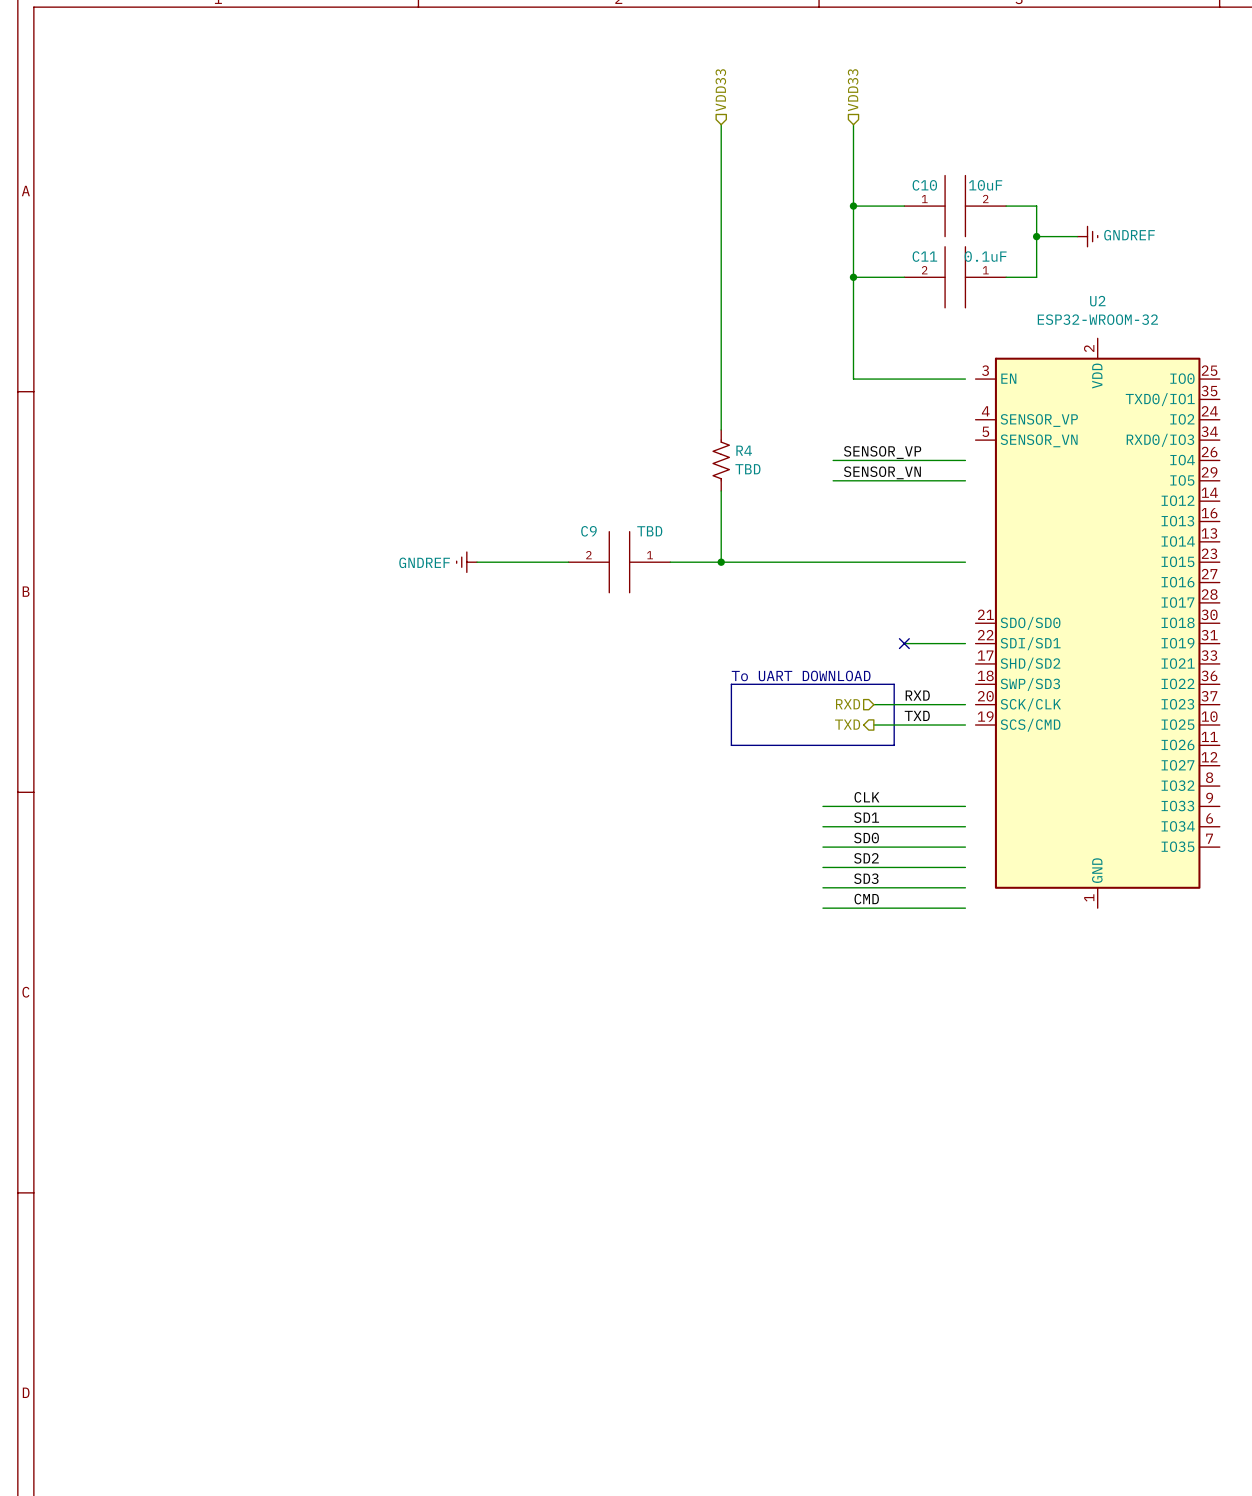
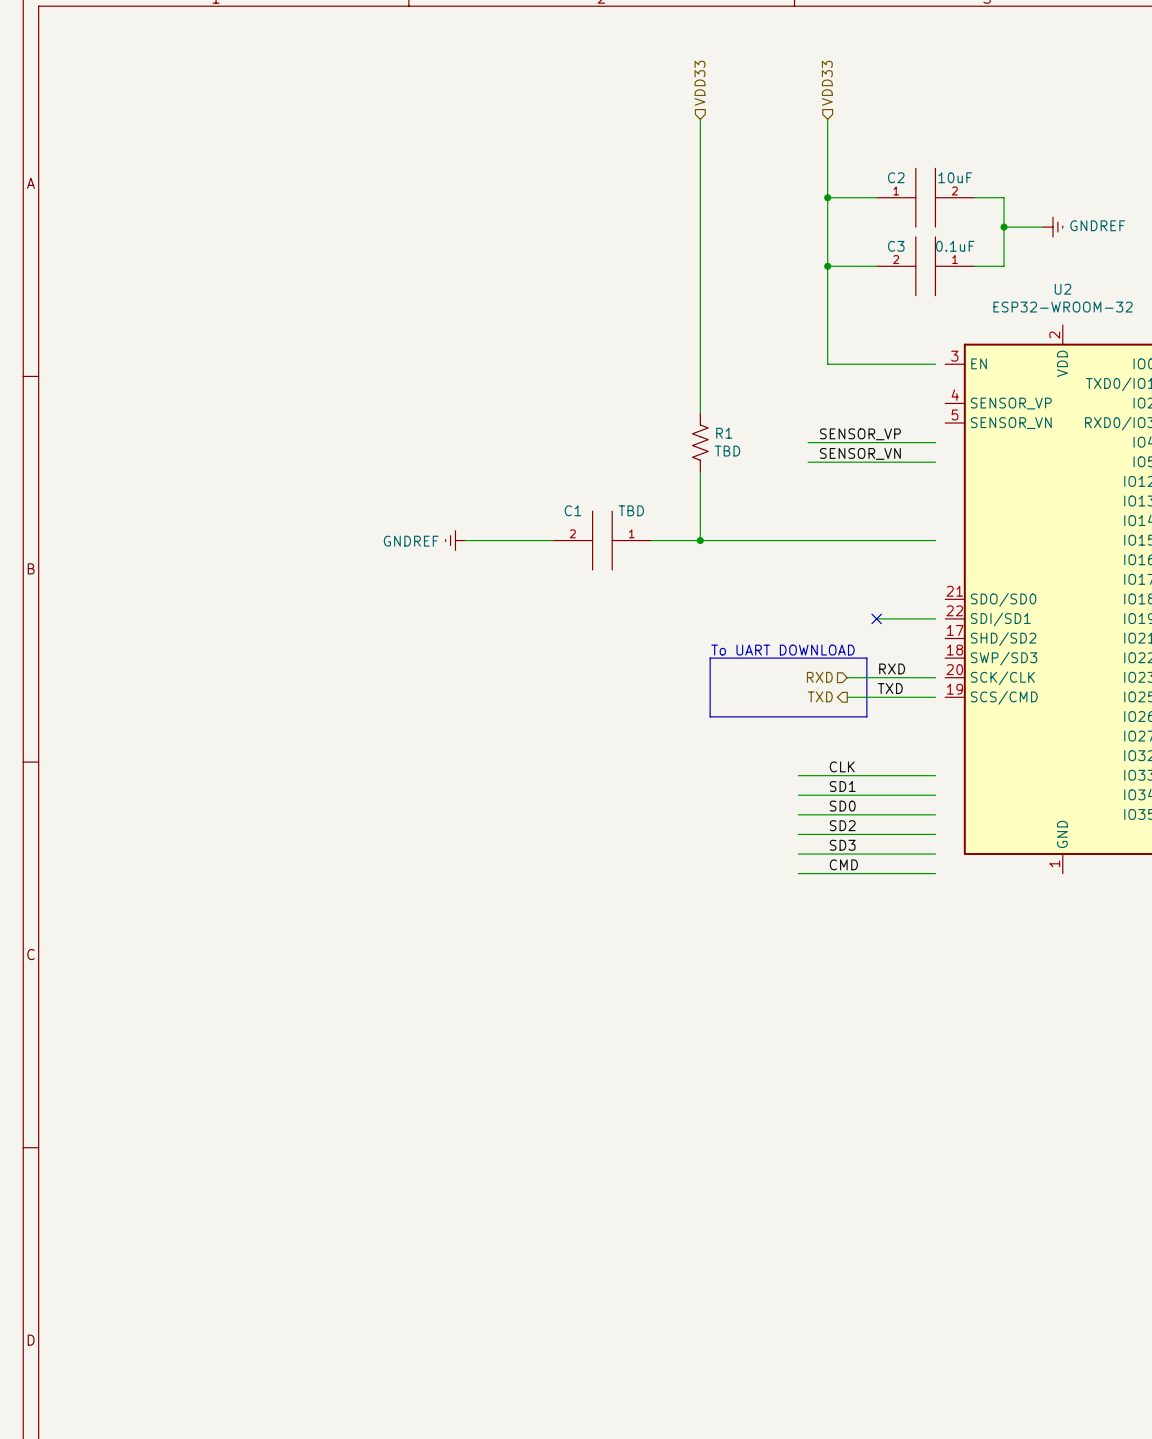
C10 name: C10 (924, 185) -> C2 (896, 177)
C11 name: C11 (924, 256) -> C3 (896, 246)
R4 name: R4 (744, 450) -> R1 (724, 433)
C9 name: C9 (588, 531) -> C1 (573, 510)

